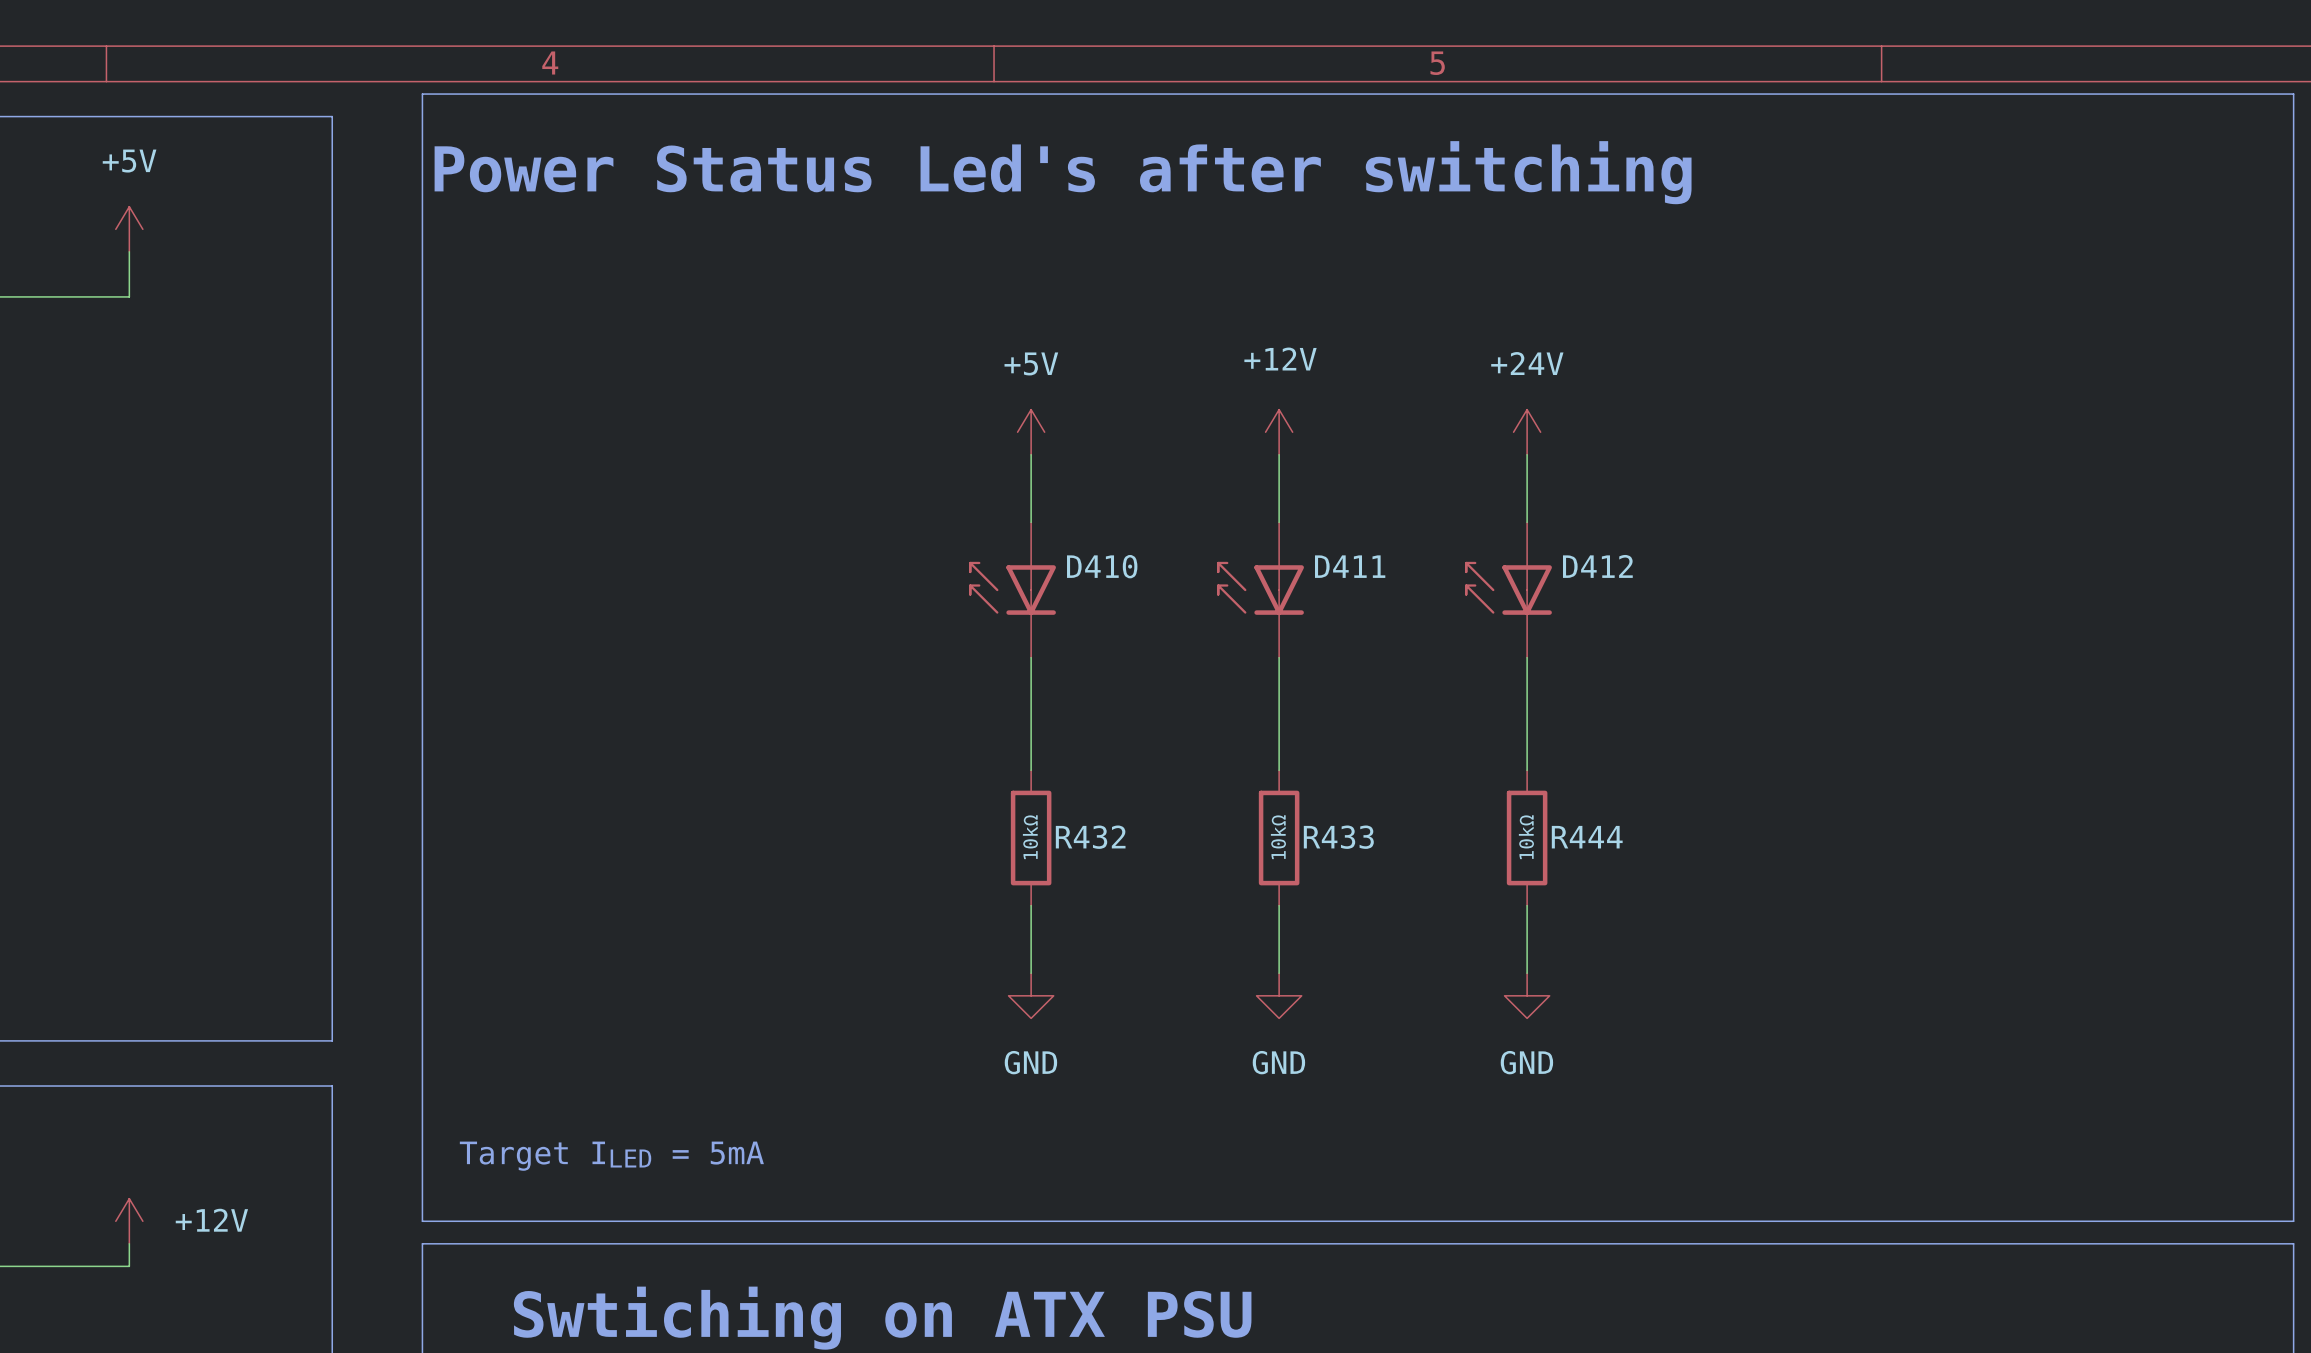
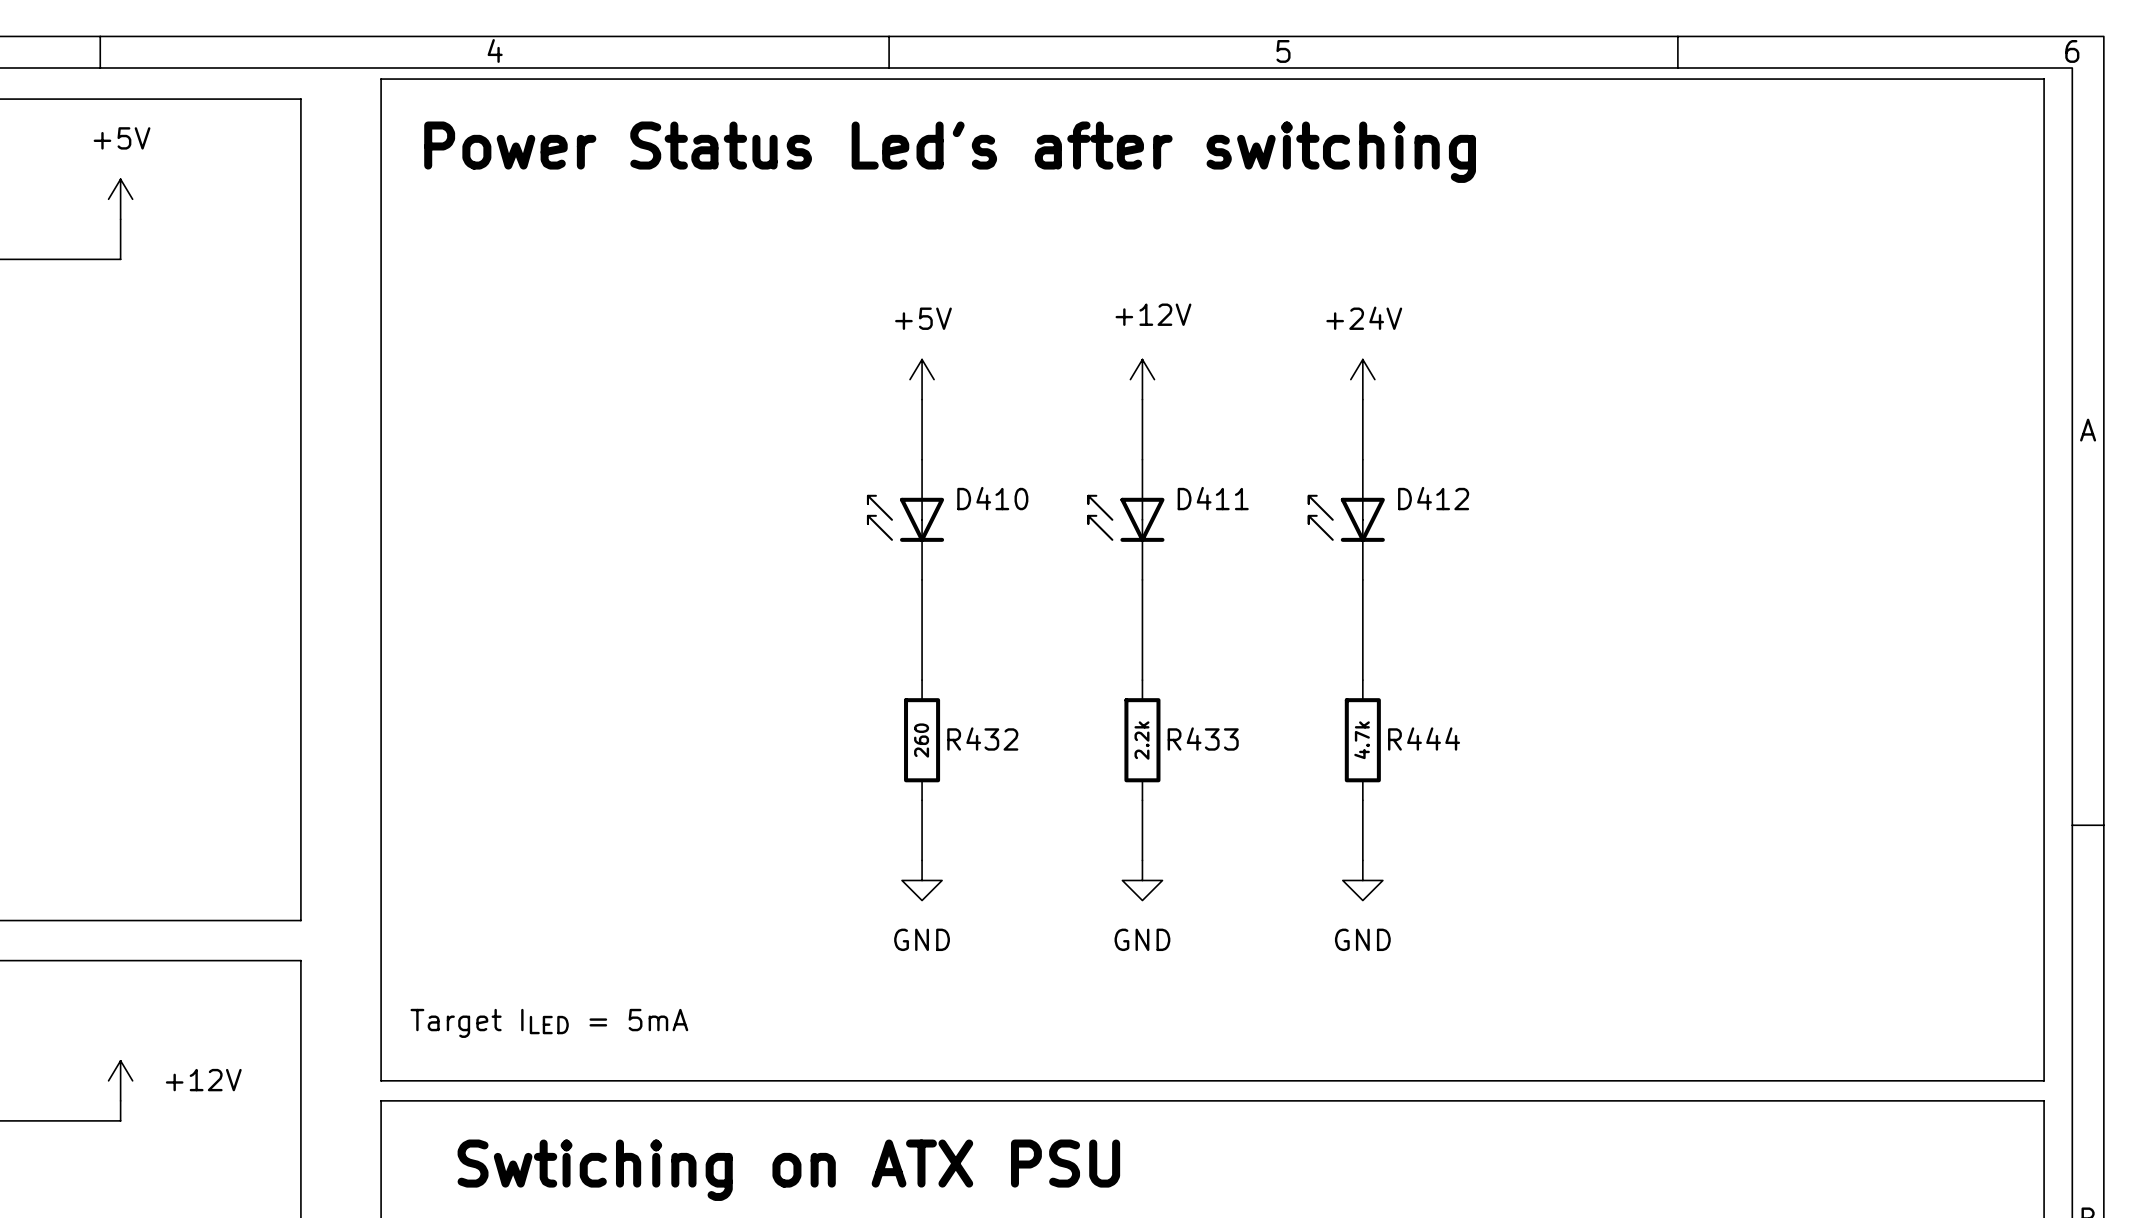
R432 value: 10kΩ (1030, 837) -> 260 (921, 740)
R433 value: 10kΩ (1278, 837) -> 2.2k (1141, 740)
R444 value: 10kΩ (1526, 837) -> 4.7k (1362, 740)

